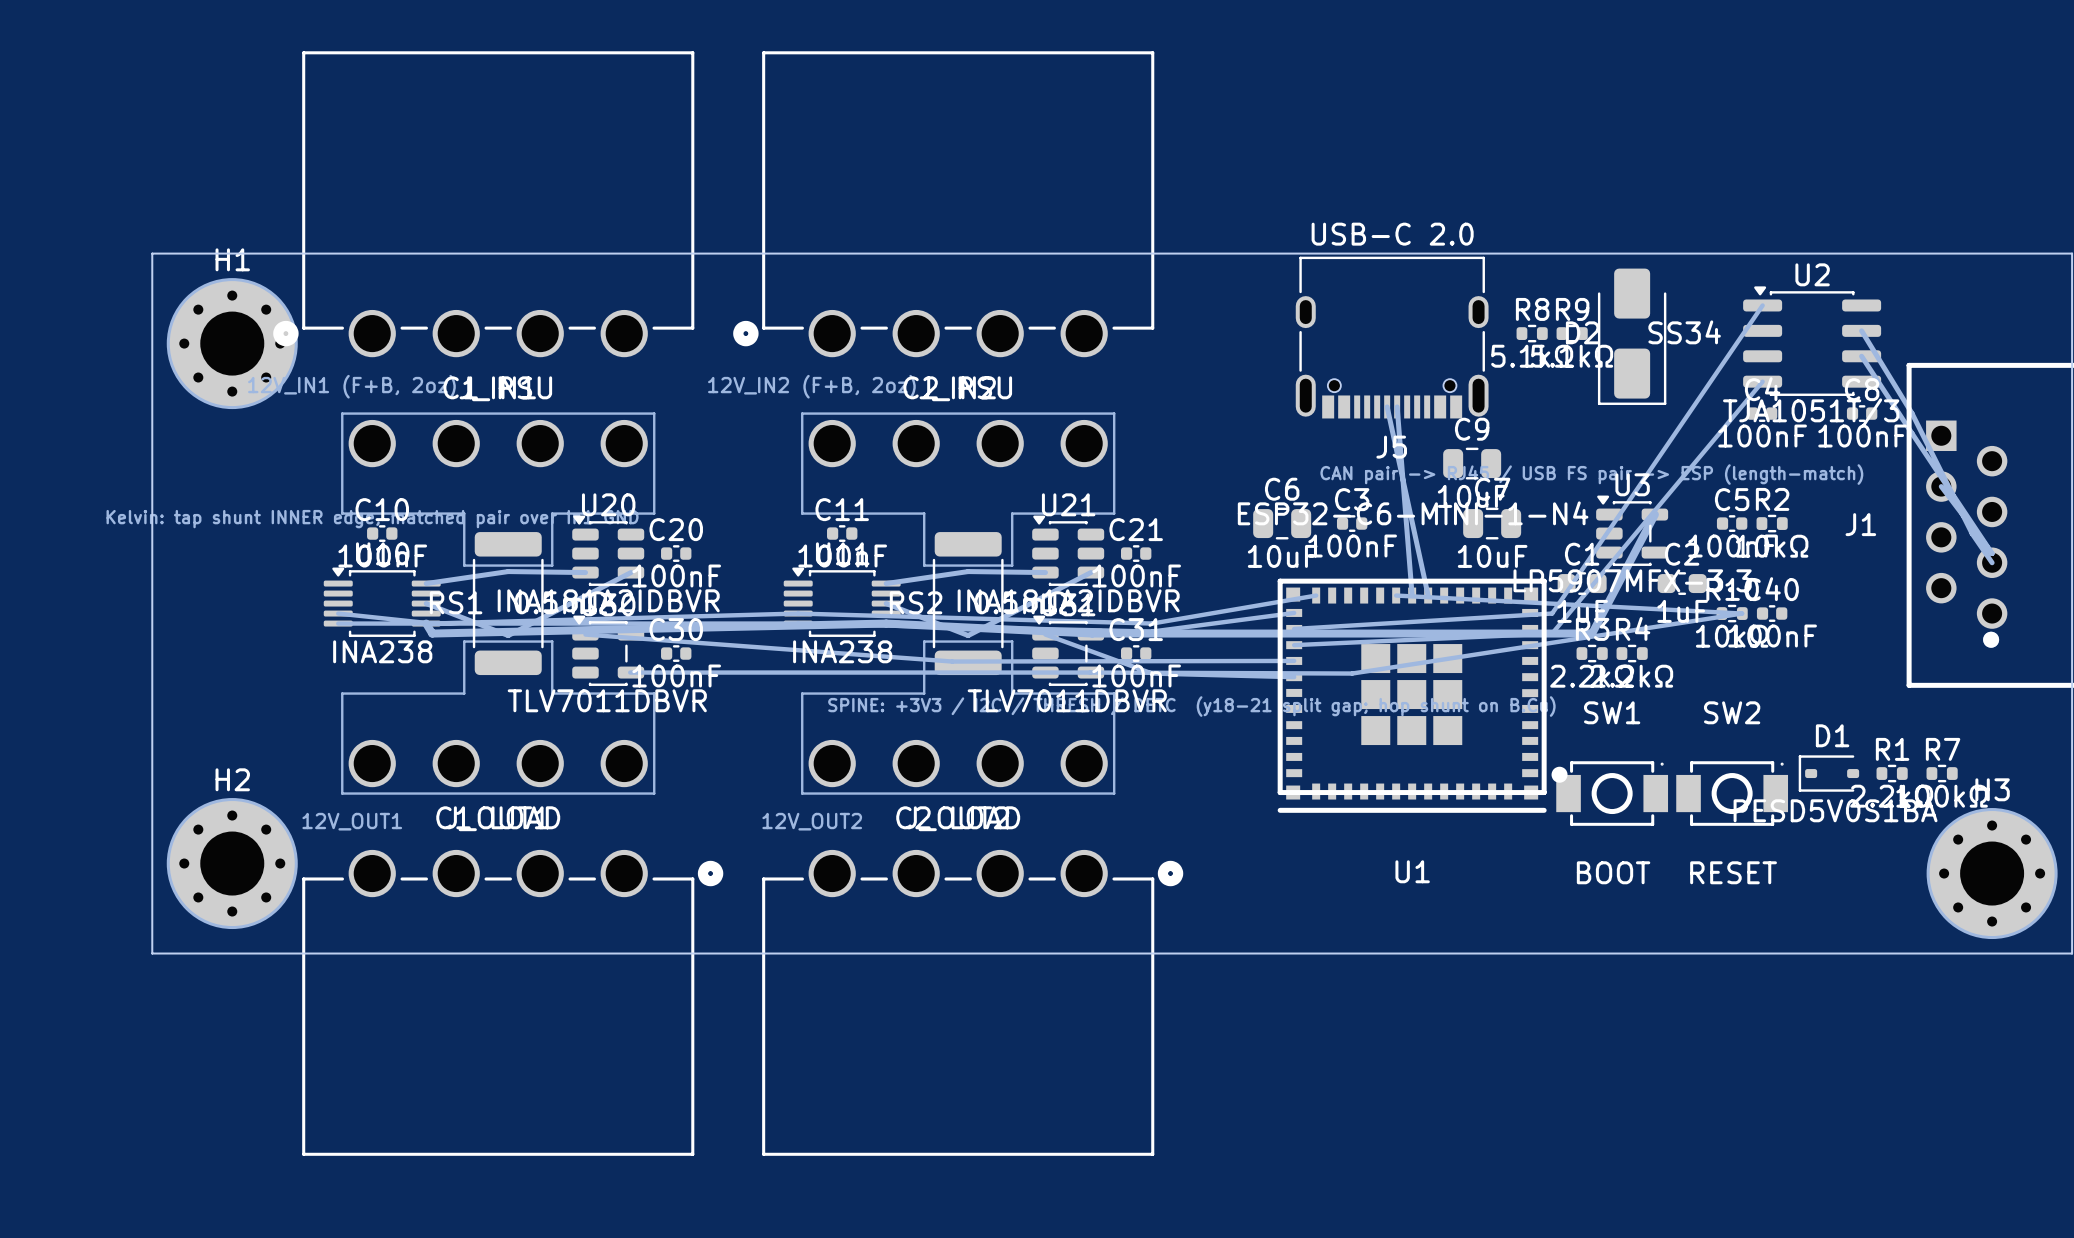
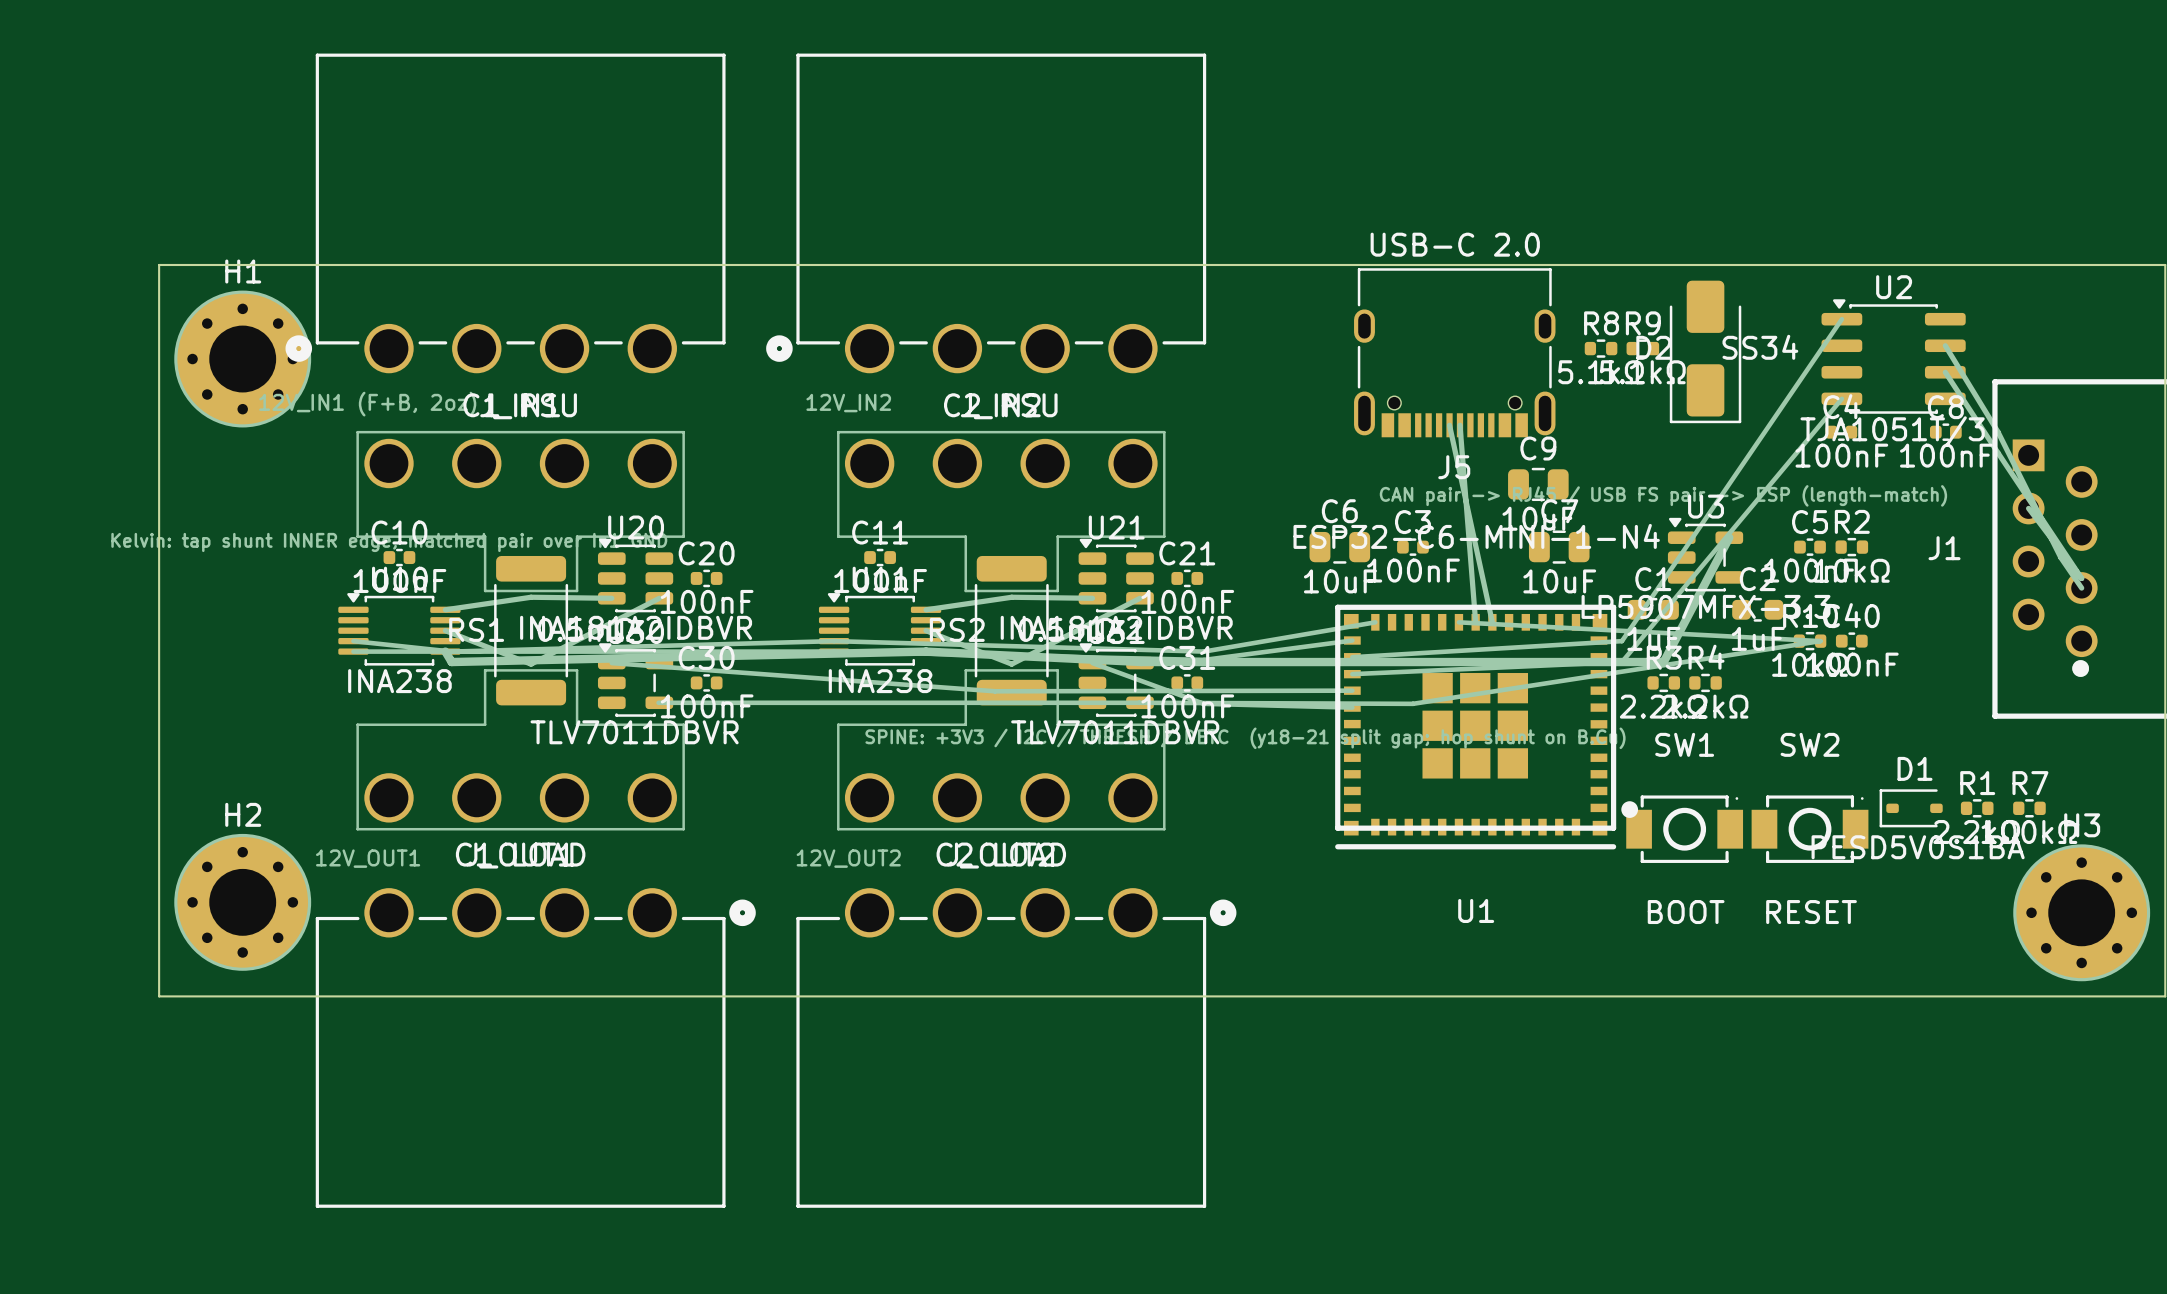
text: 12V_IN2 (F+B, 2oz) (811, 386) -> 12V_IN2 (848, 403)

